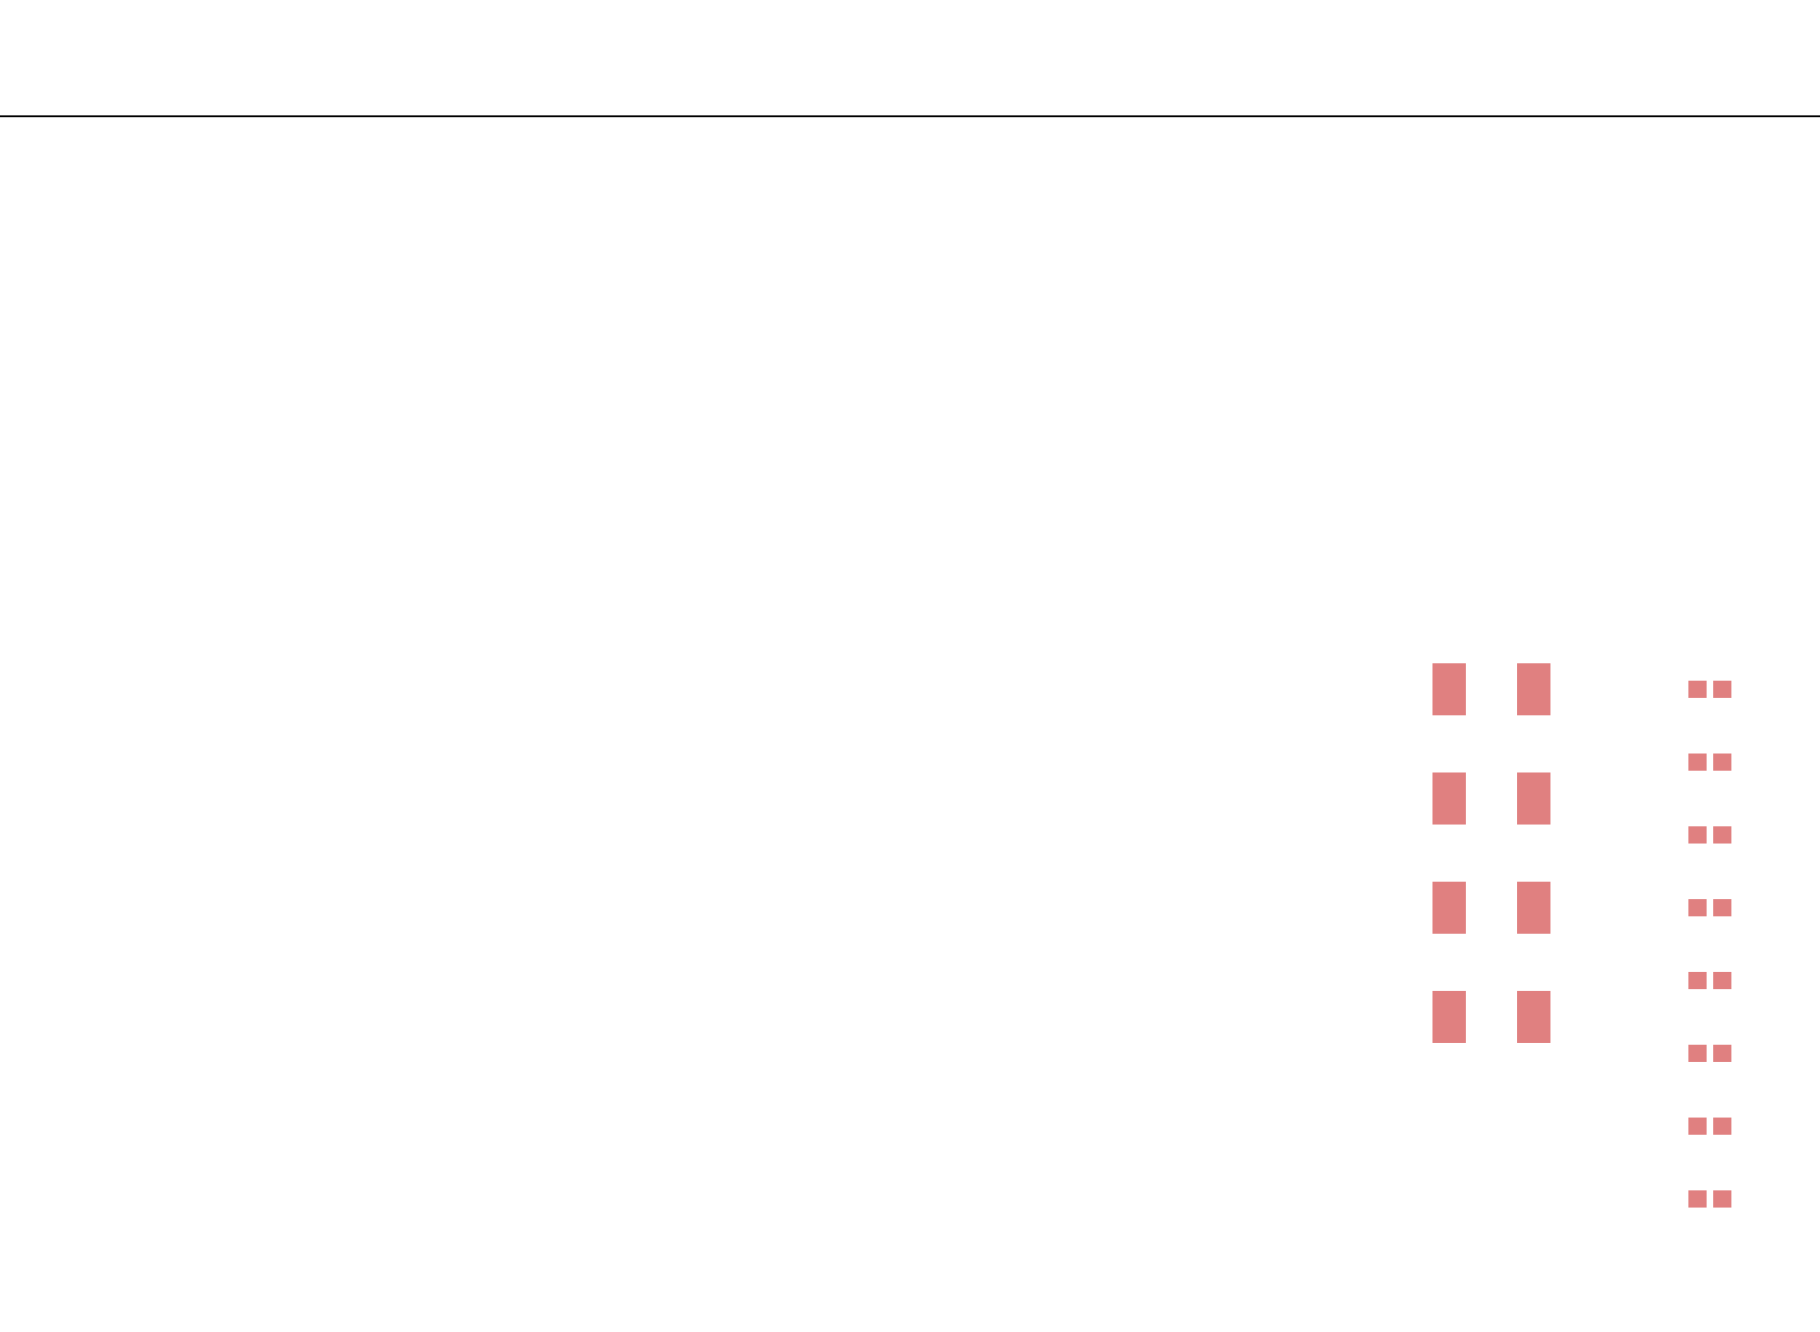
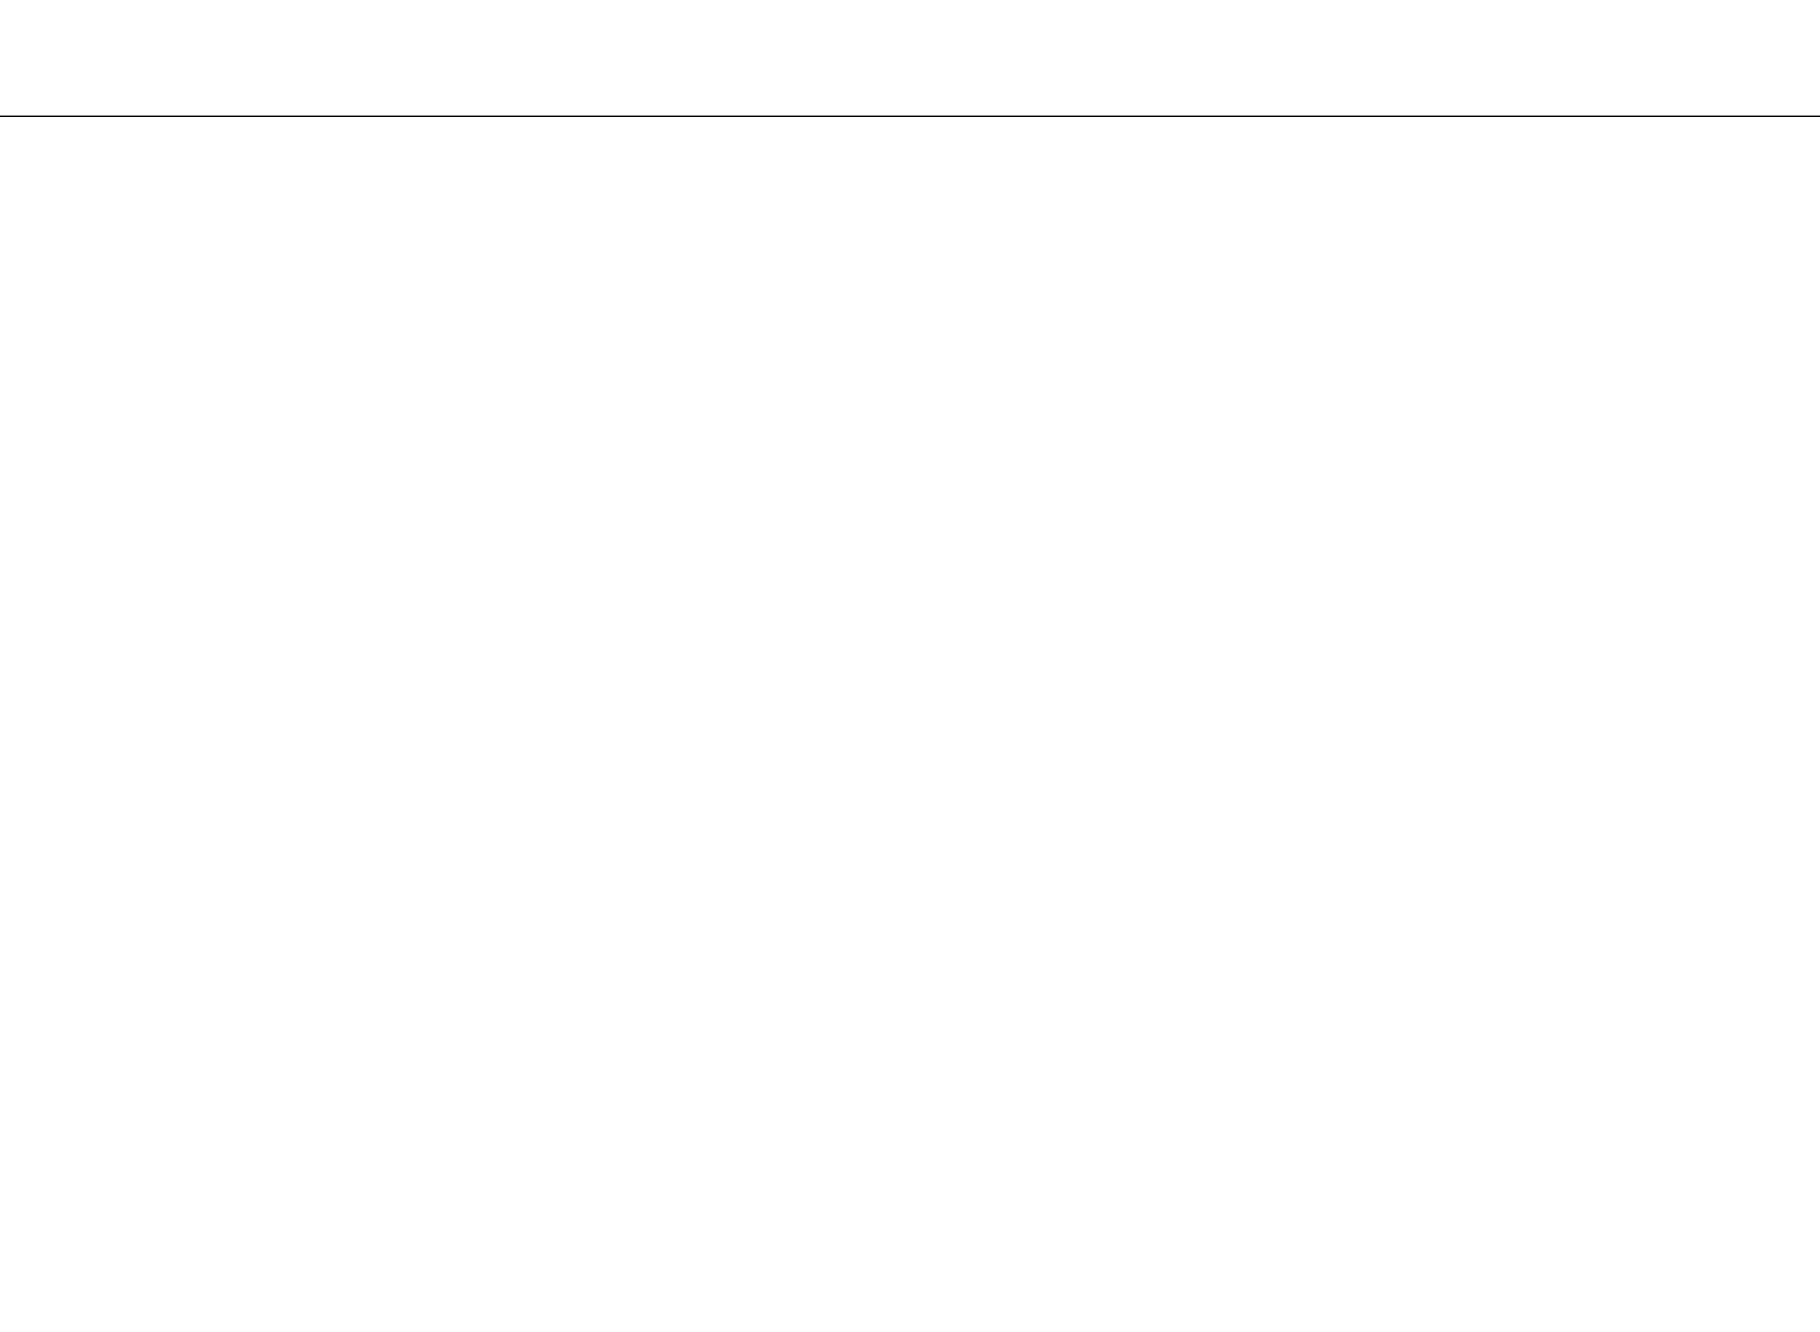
part: (1491, 689) -> none
part: (1709, 689) -> none
part: (1709, 762) -> none
part: (1491, 798) -> none
part: (1709, 834) -> none
part: (1491, 907) -> none
part: (1709, 907) -> none
part: (1709, 980) -> none
part: (1491, 1016) -> none
part: (1709, 1053) -> none
part: (1709, 1126) -> none
part: (1709, 1198) -> none

